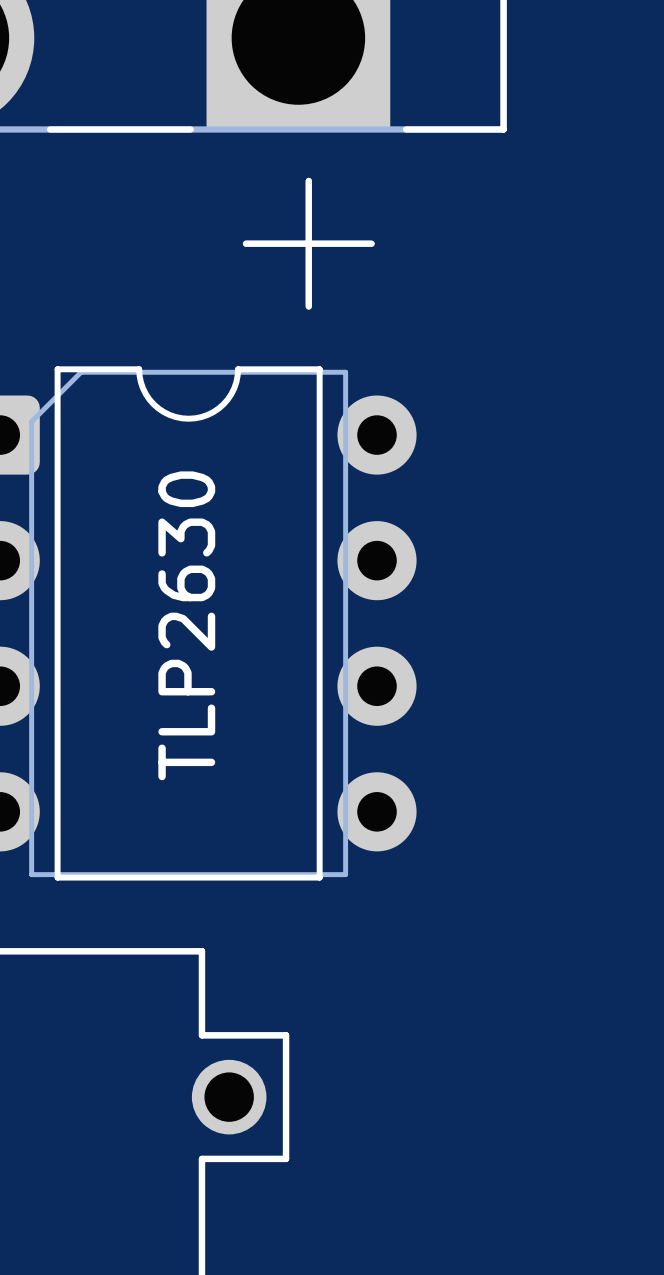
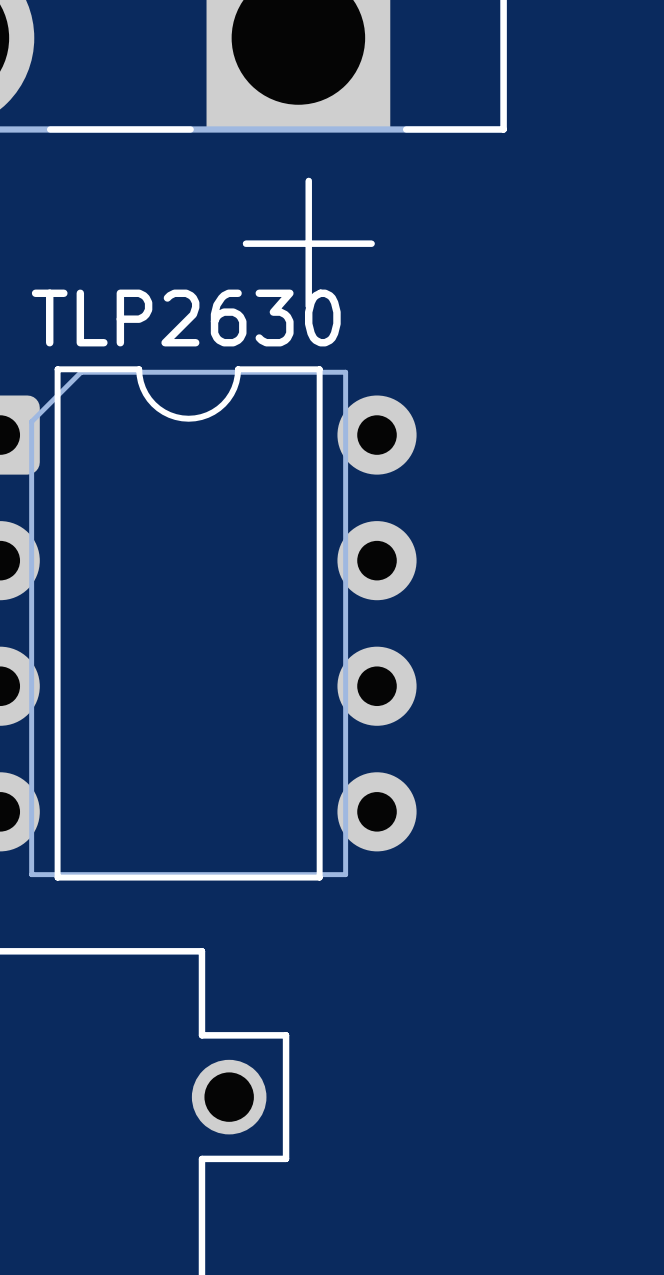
TLP2630 name rotation: 0° (186, 625) -> 90° clockwise (186, 318)

